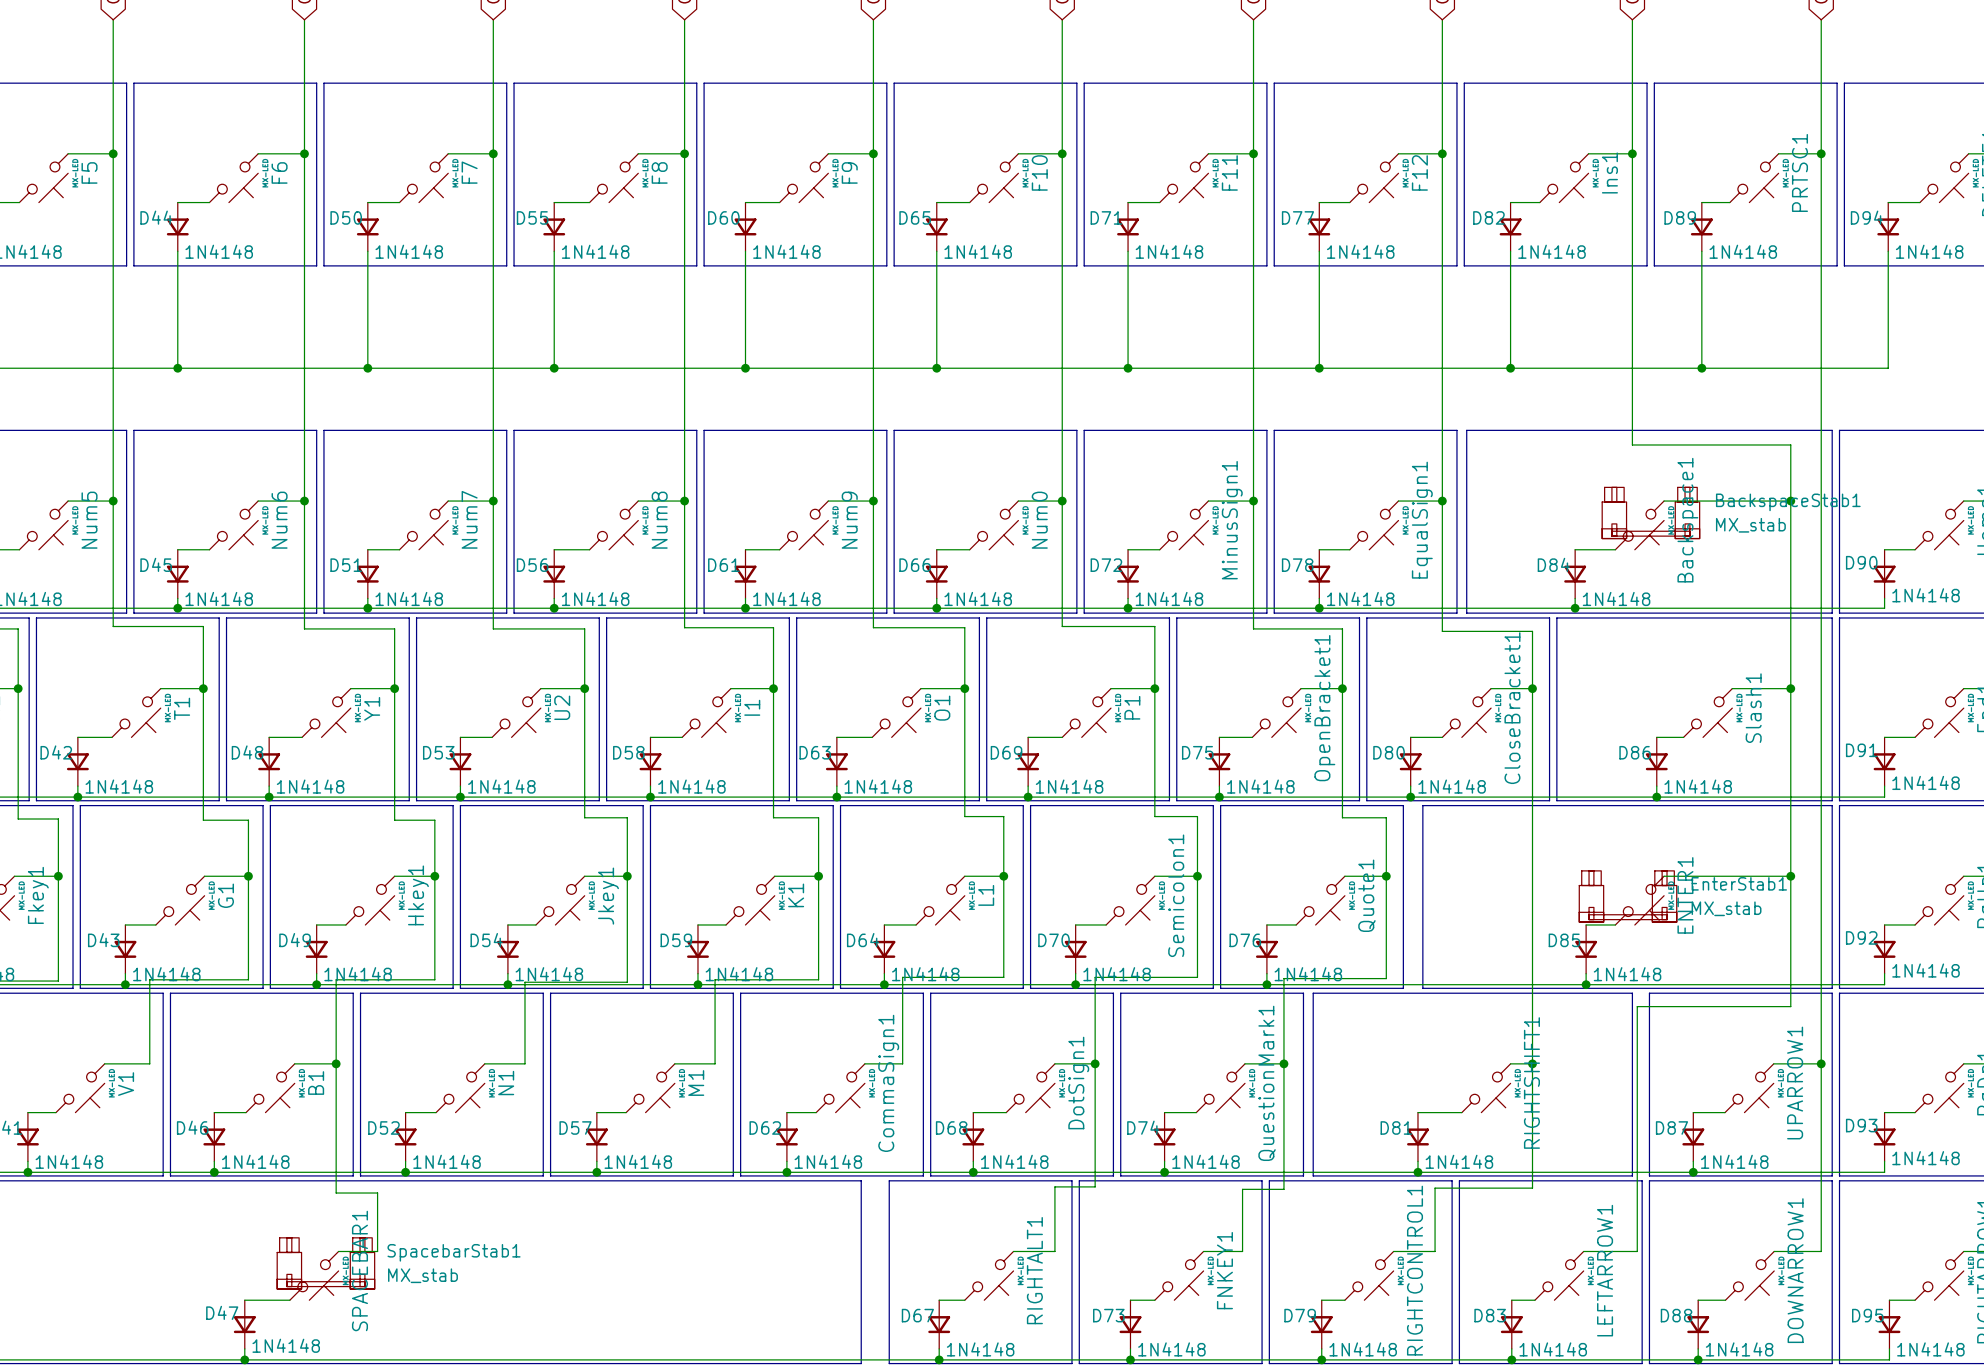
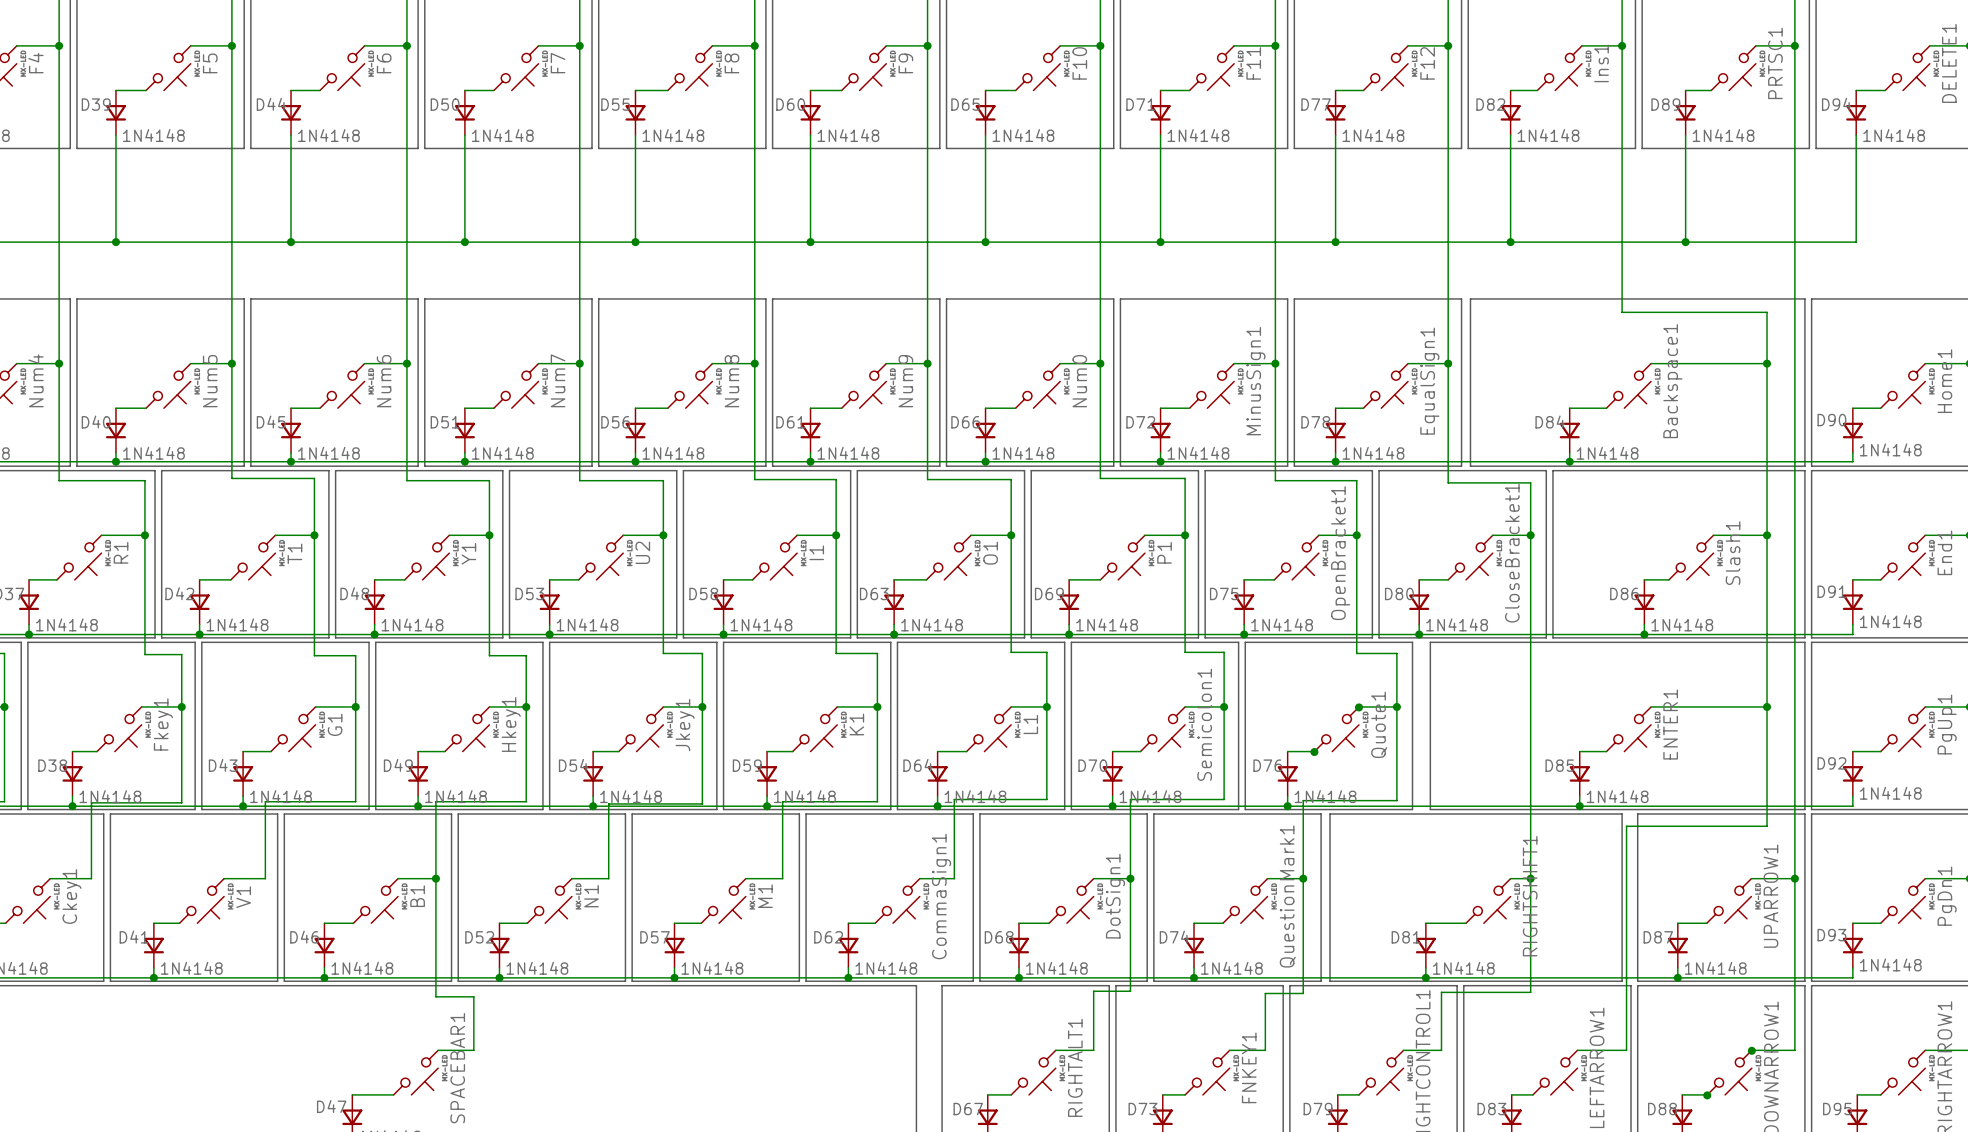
BackspaceStab1: MX_stab (1650, 512) -> none
junction: none -> (1358, 707)
EnterStab1: MX_stab (1628, 896) -> none
junction: none -> (1314, 752)
junction: none -> (1751, 1050)
SpacebarStab1: MX_stab (325, 1263) -> none
junction: none -> (1707, 1095)

